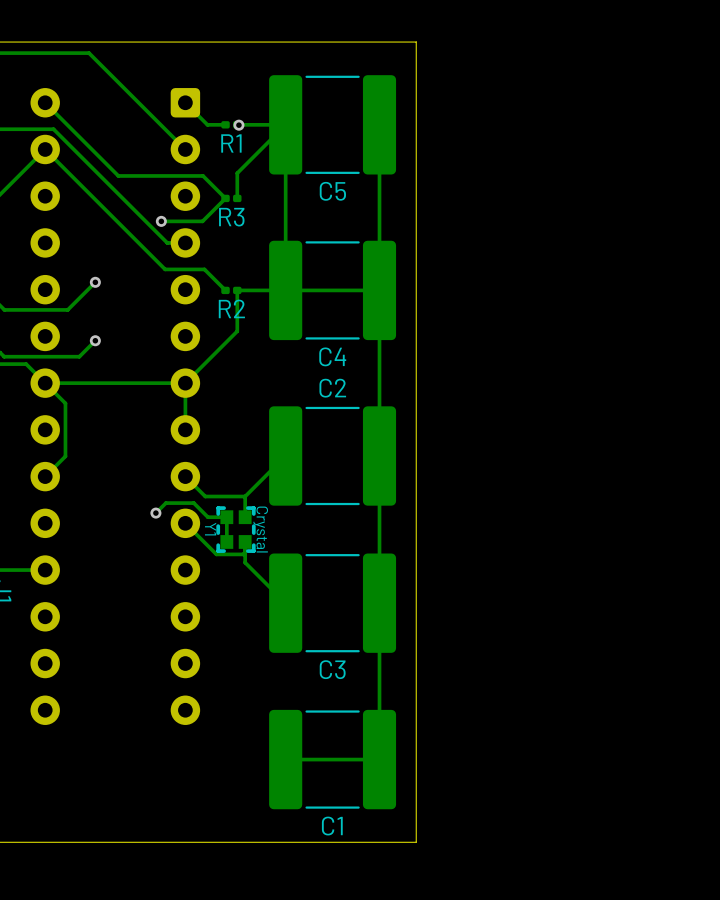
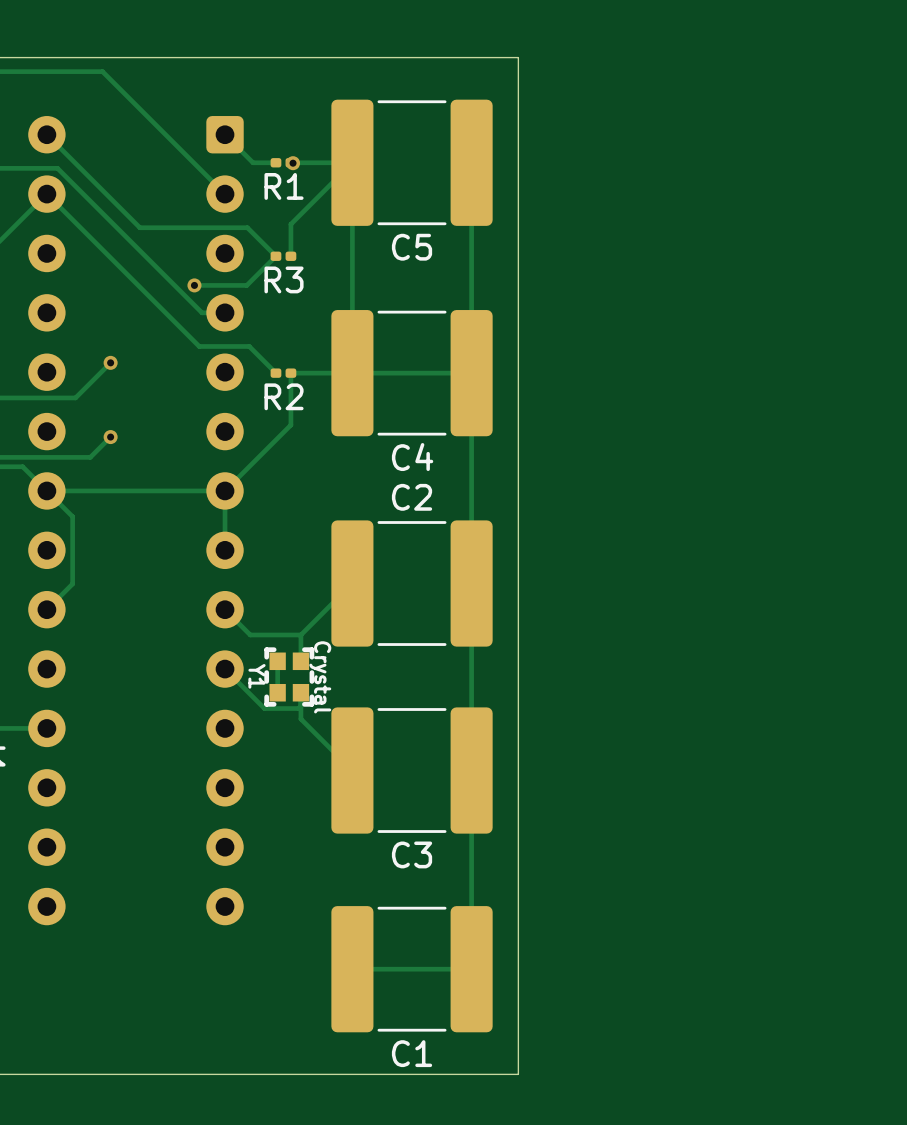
track: (155, 513) (165, 503) (193, 503) (207, 517) (226, 517) -> none
via: (155, 513) -> none

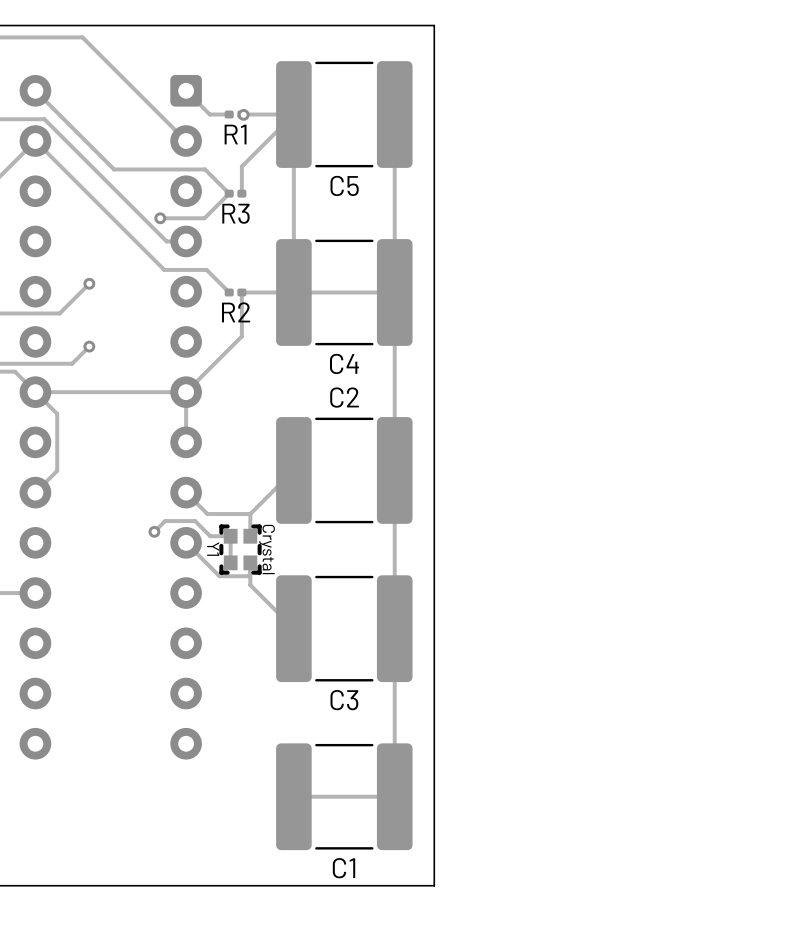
track: none -> (154, 531) (165, 521) (195, 521) (210, 536) (230, 536)
via: none -> (154, 531)

